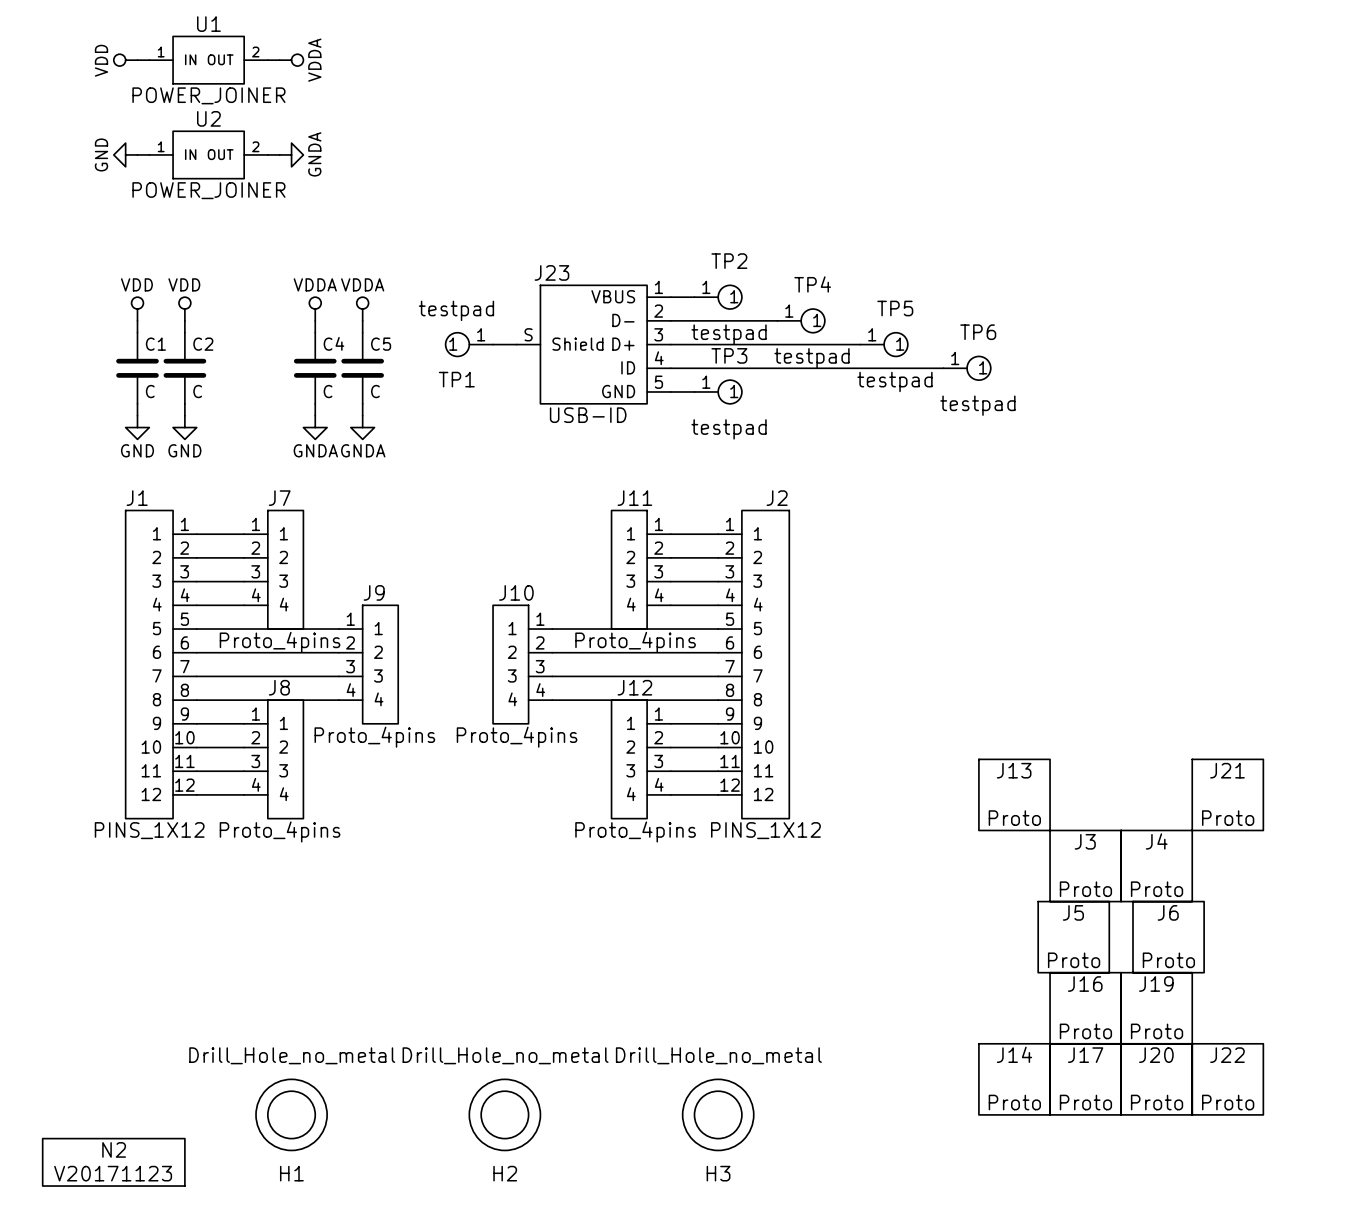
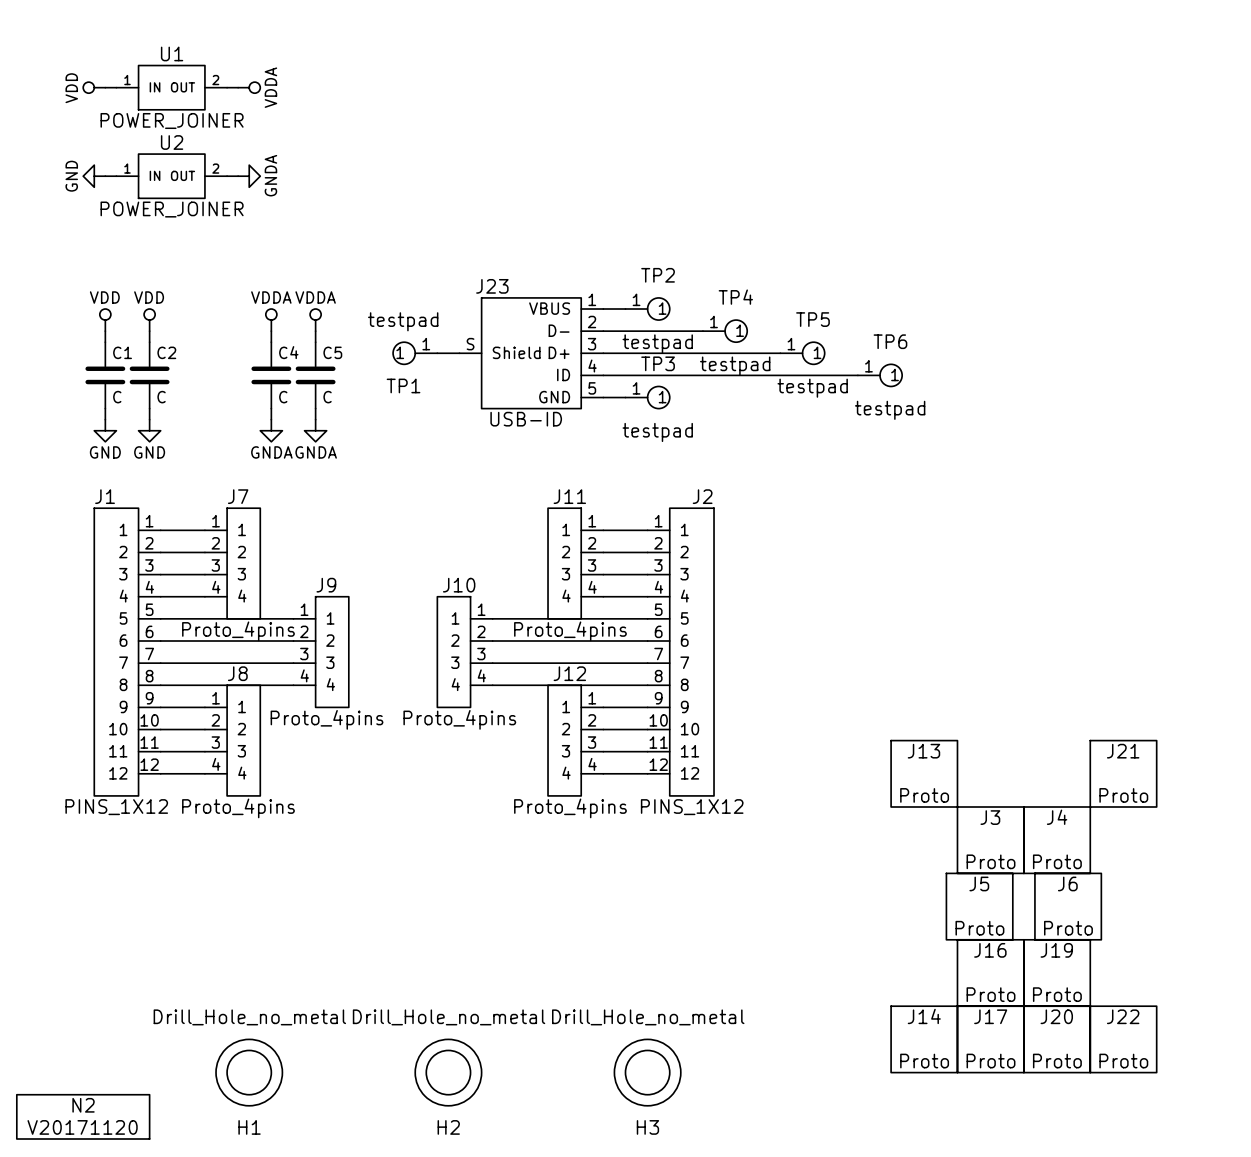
N2 value: V20171123 (113, 1173) -> V20171120 (82, 1127)

